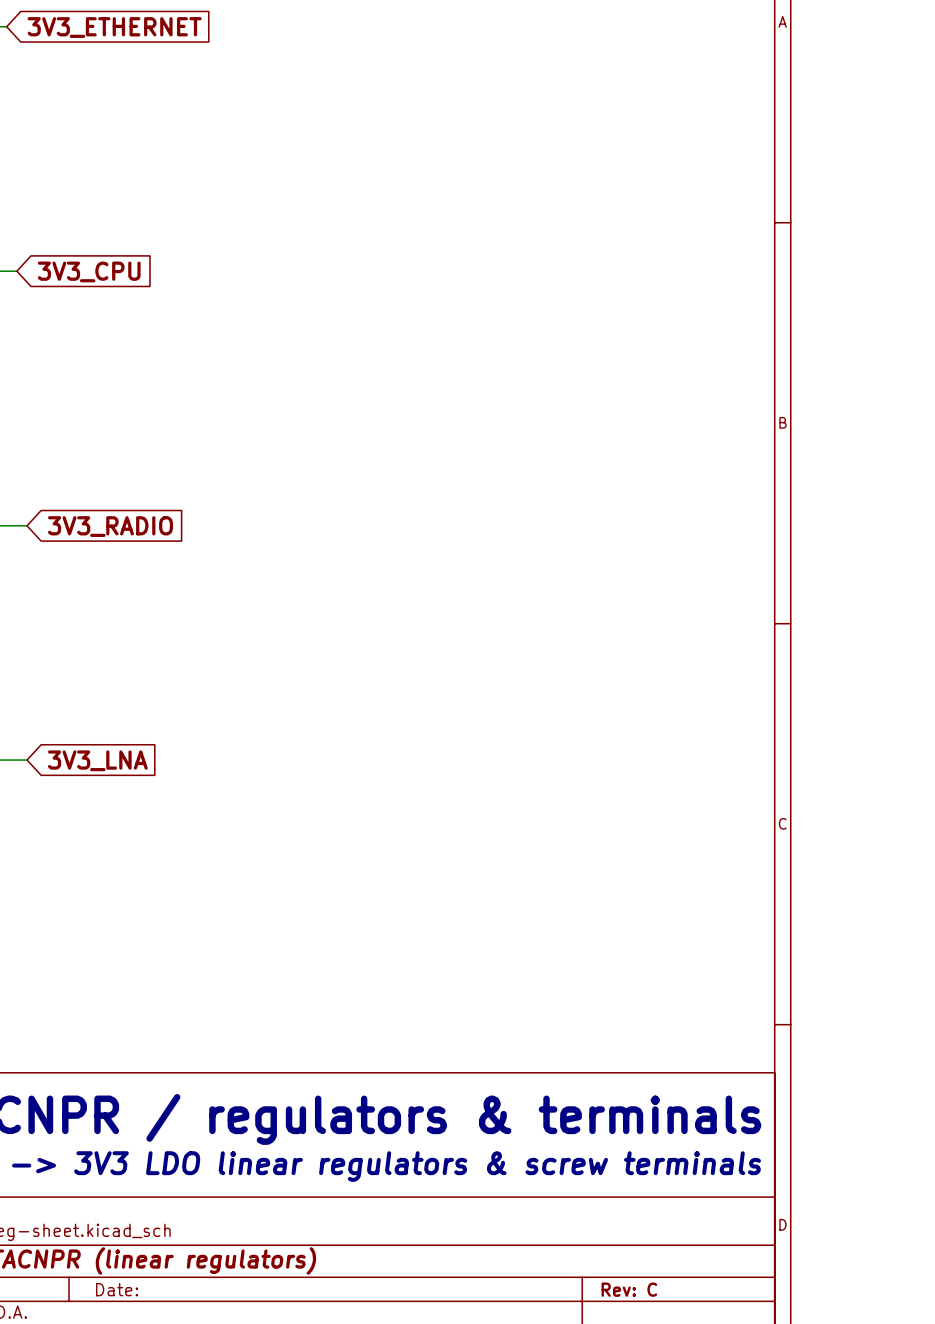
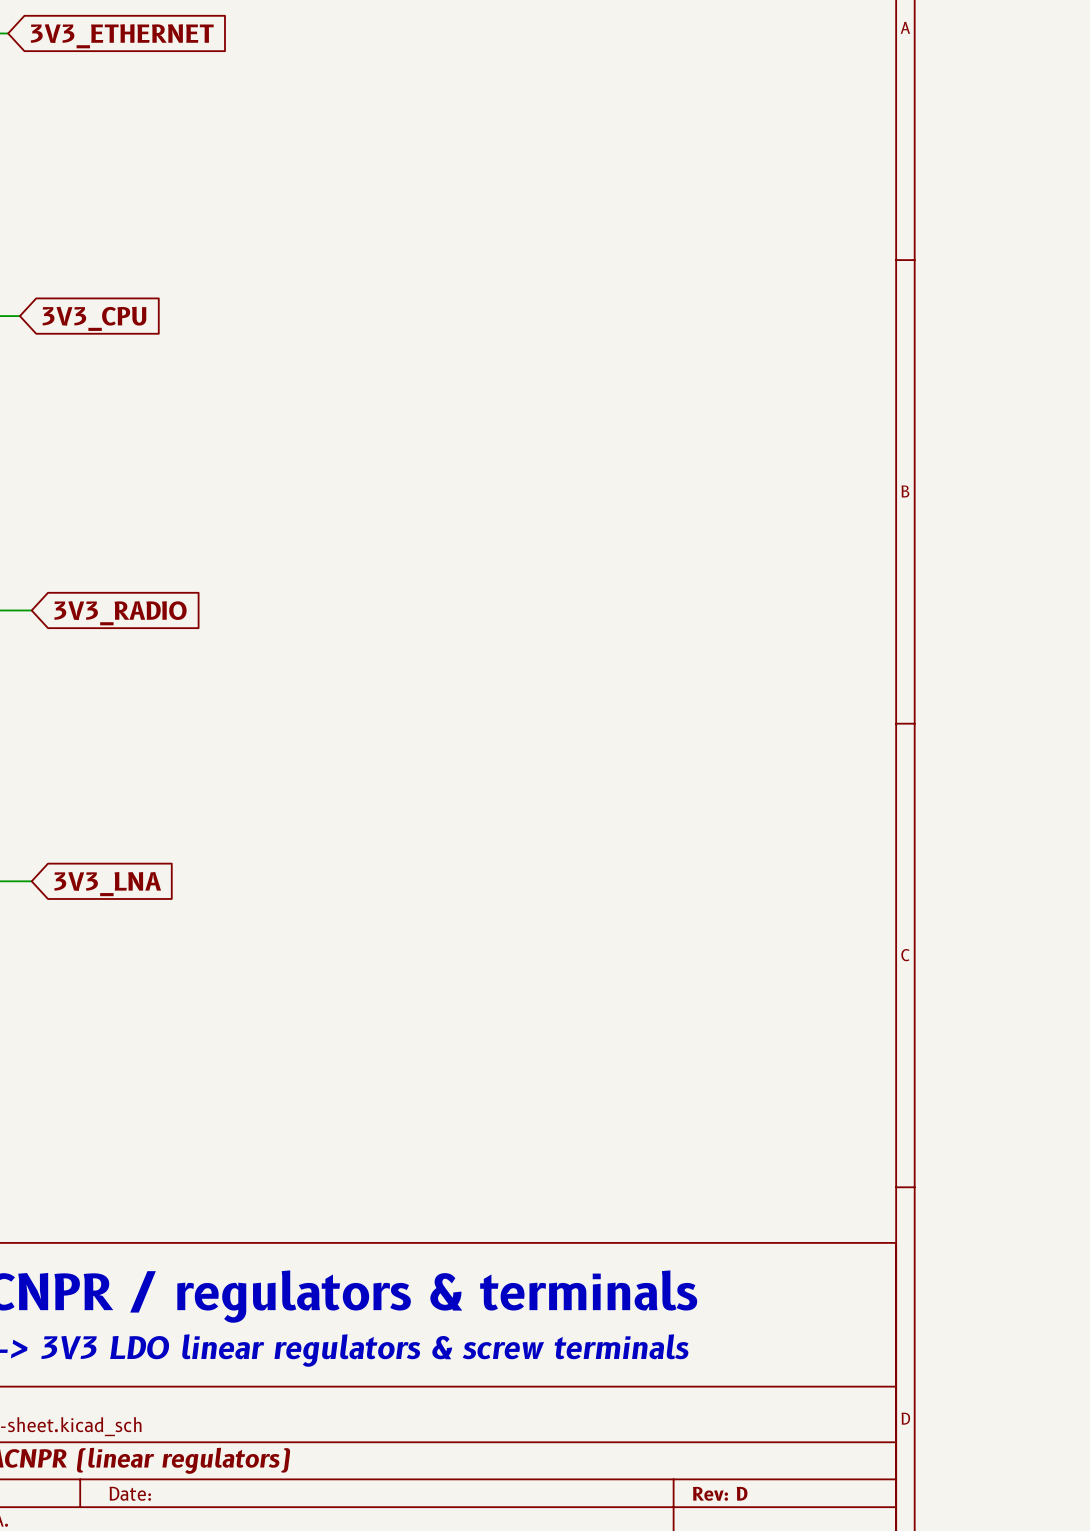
title block: Rev: C (629, 1289) -> Rev: D (720, 1493)

